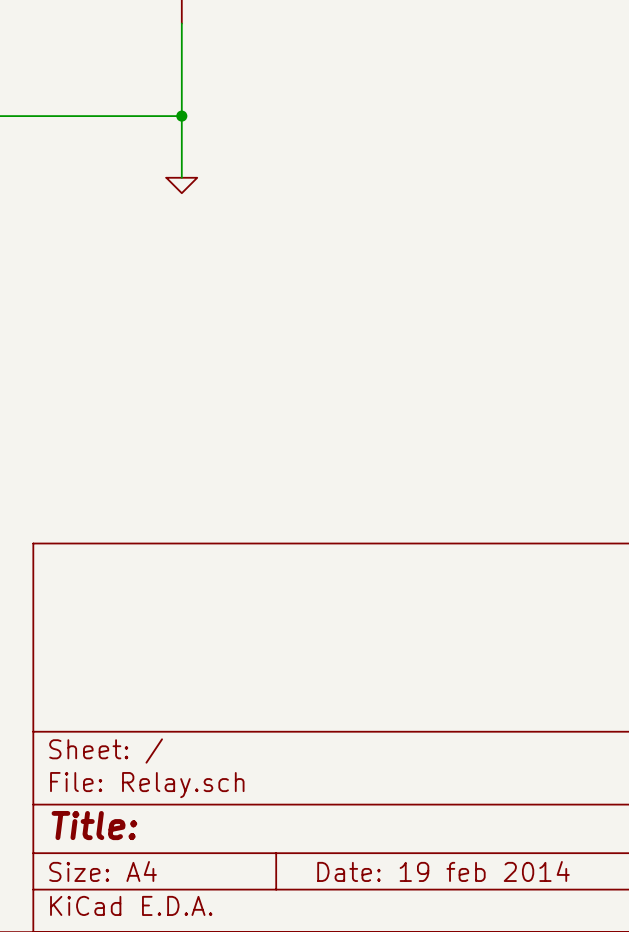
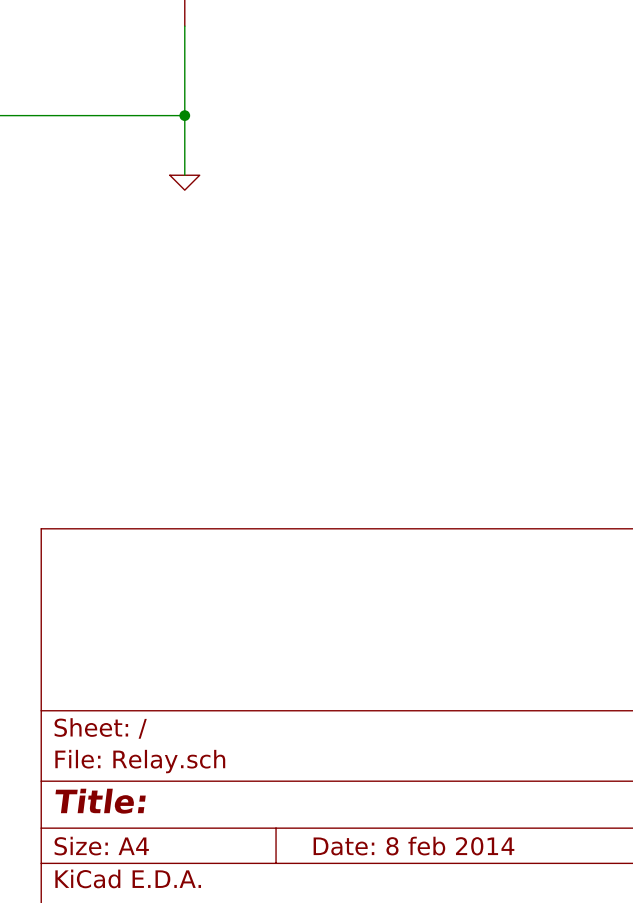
title block: Date: 19 feb 2014 (443, 871) -> Date: 8 feb 2014 (413, 846)

